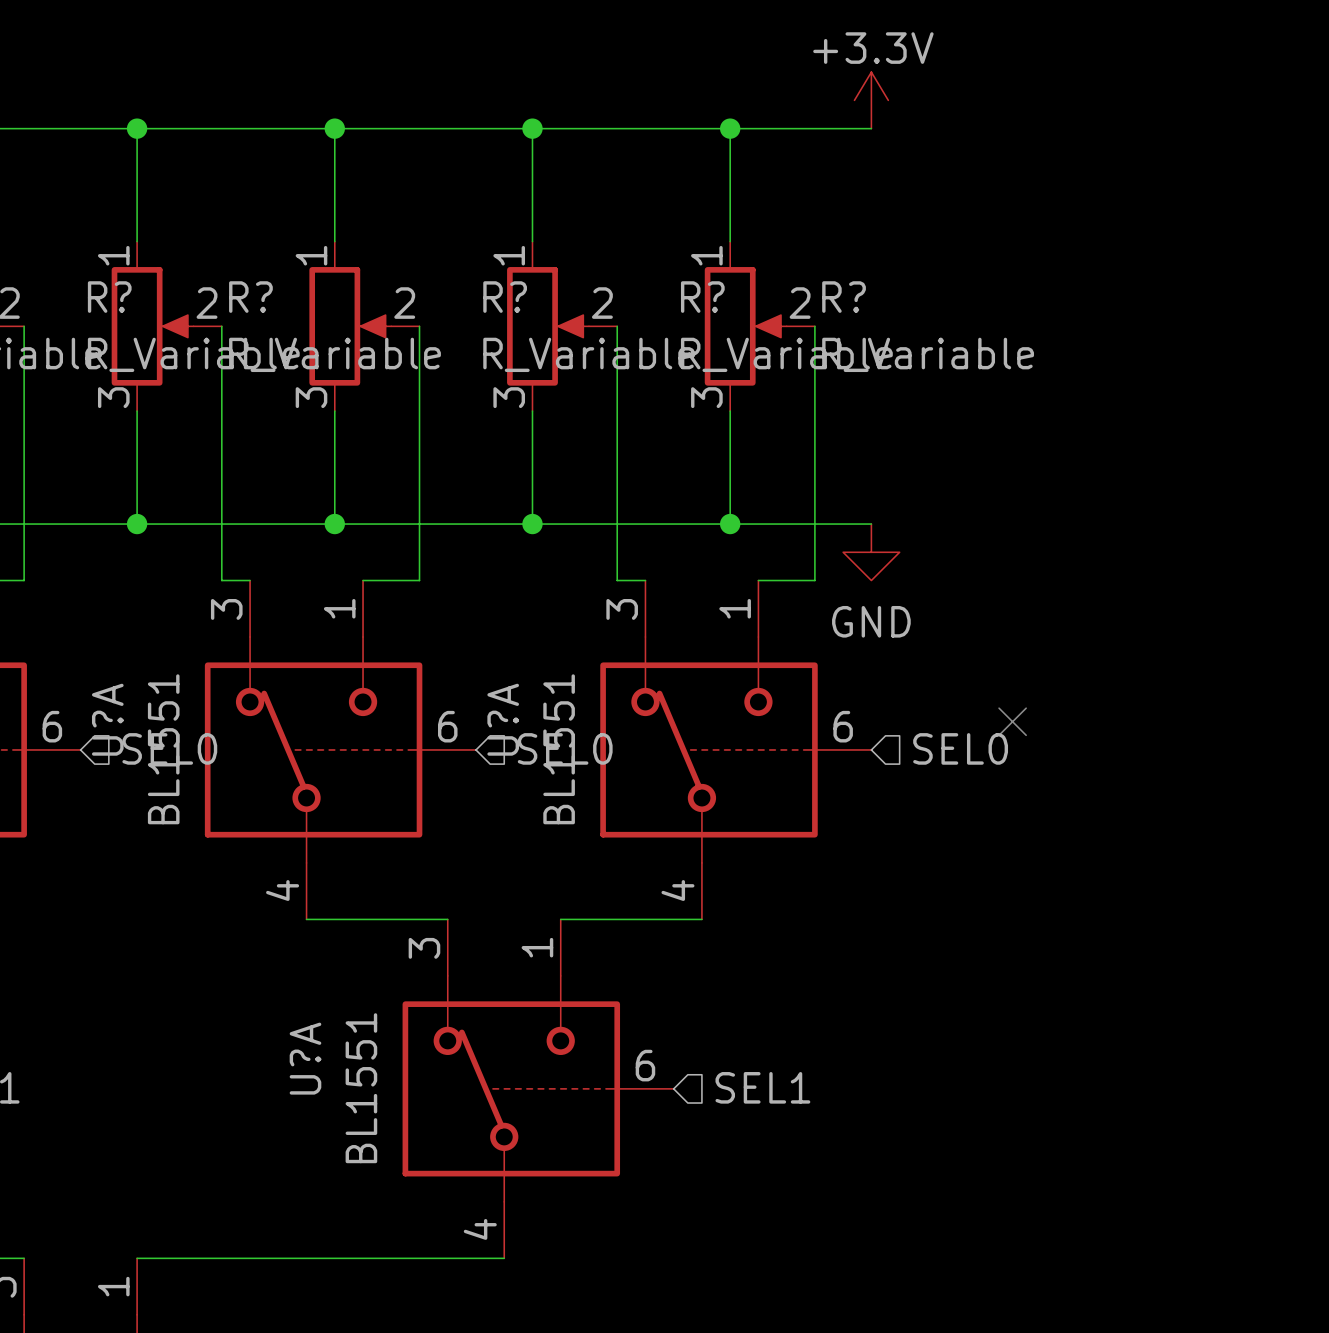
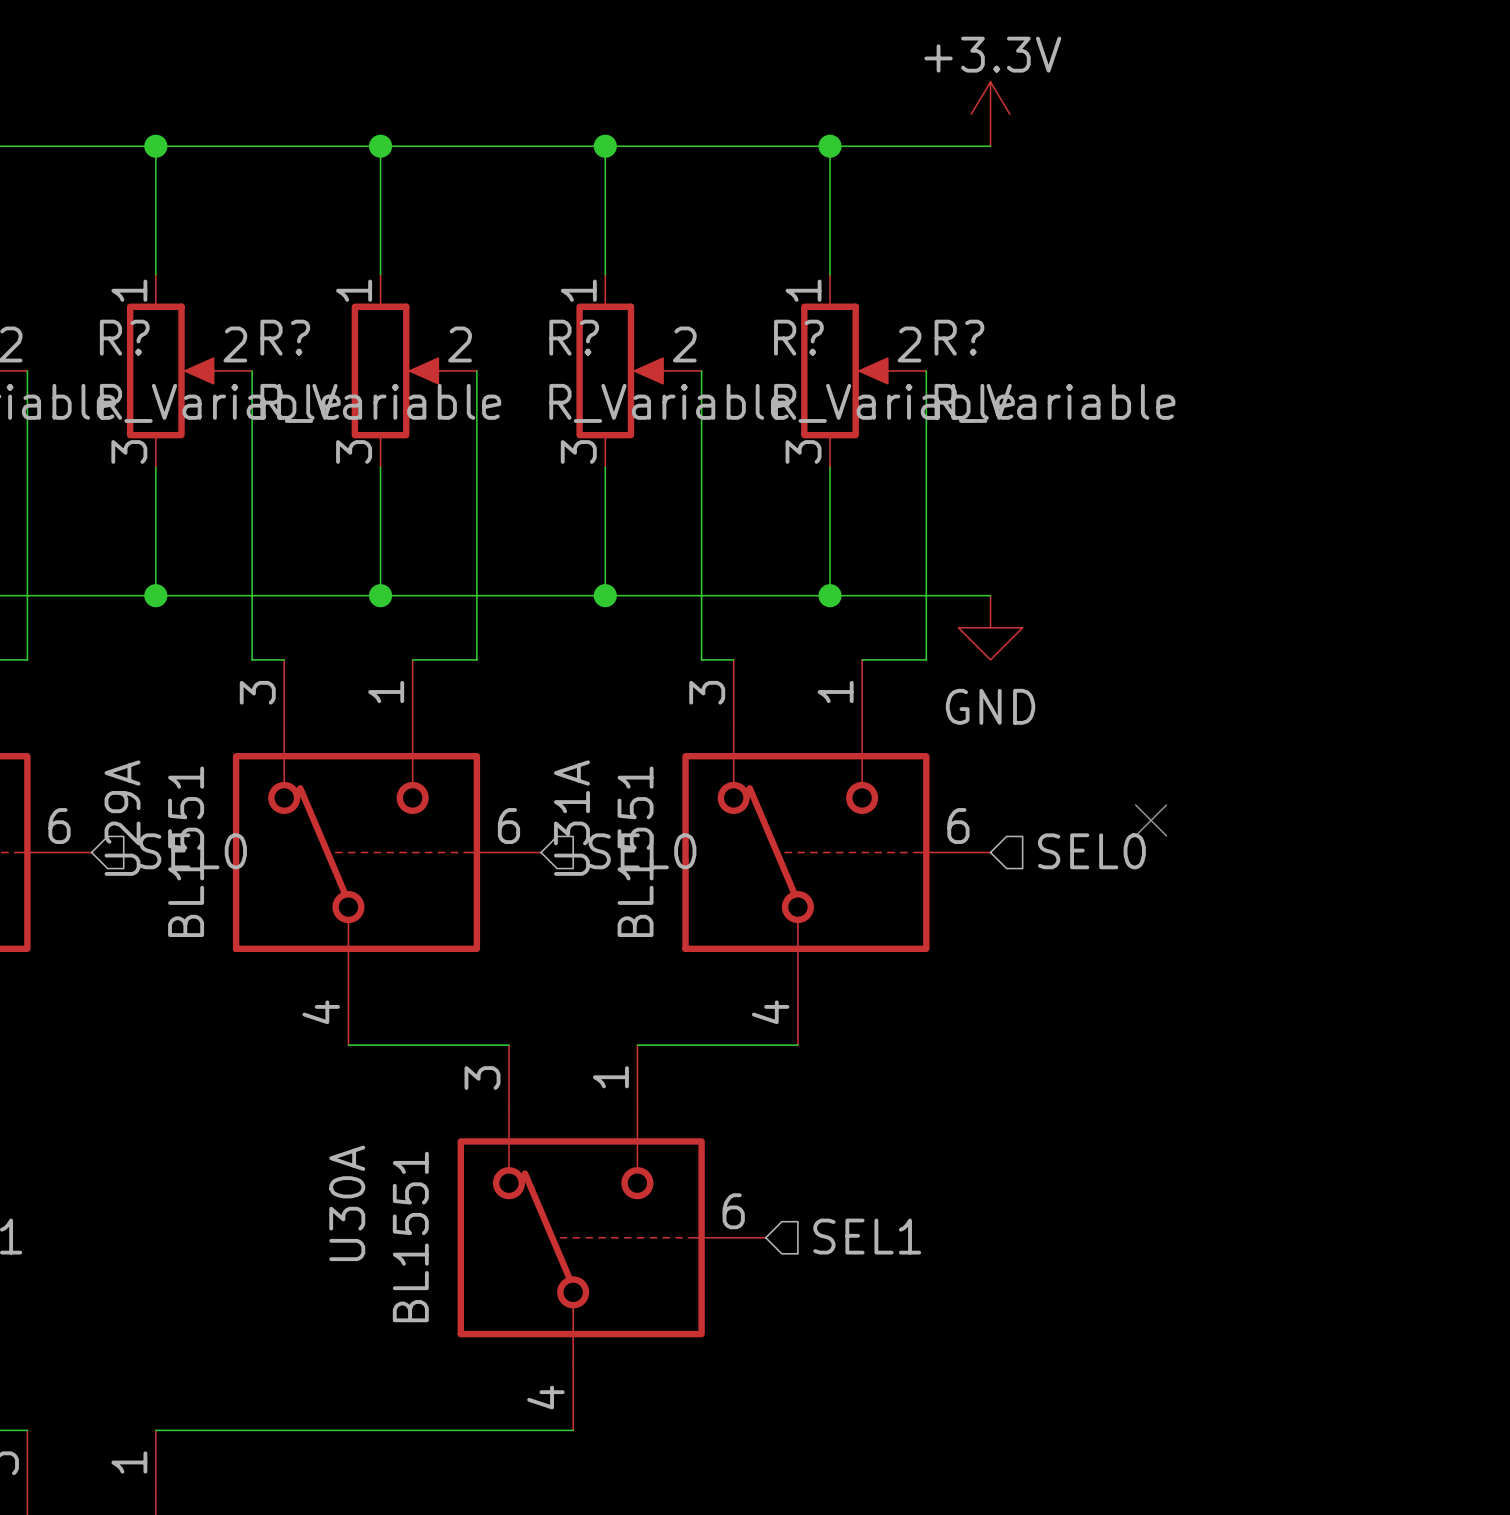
U?A name: U?A (107, 719) -> U29A (122, 818)
U?A name: U?A (503, 719) -> U31A (571, 818)
U?A name: U?A (305, 1058) -> U30A (347, 1203)

